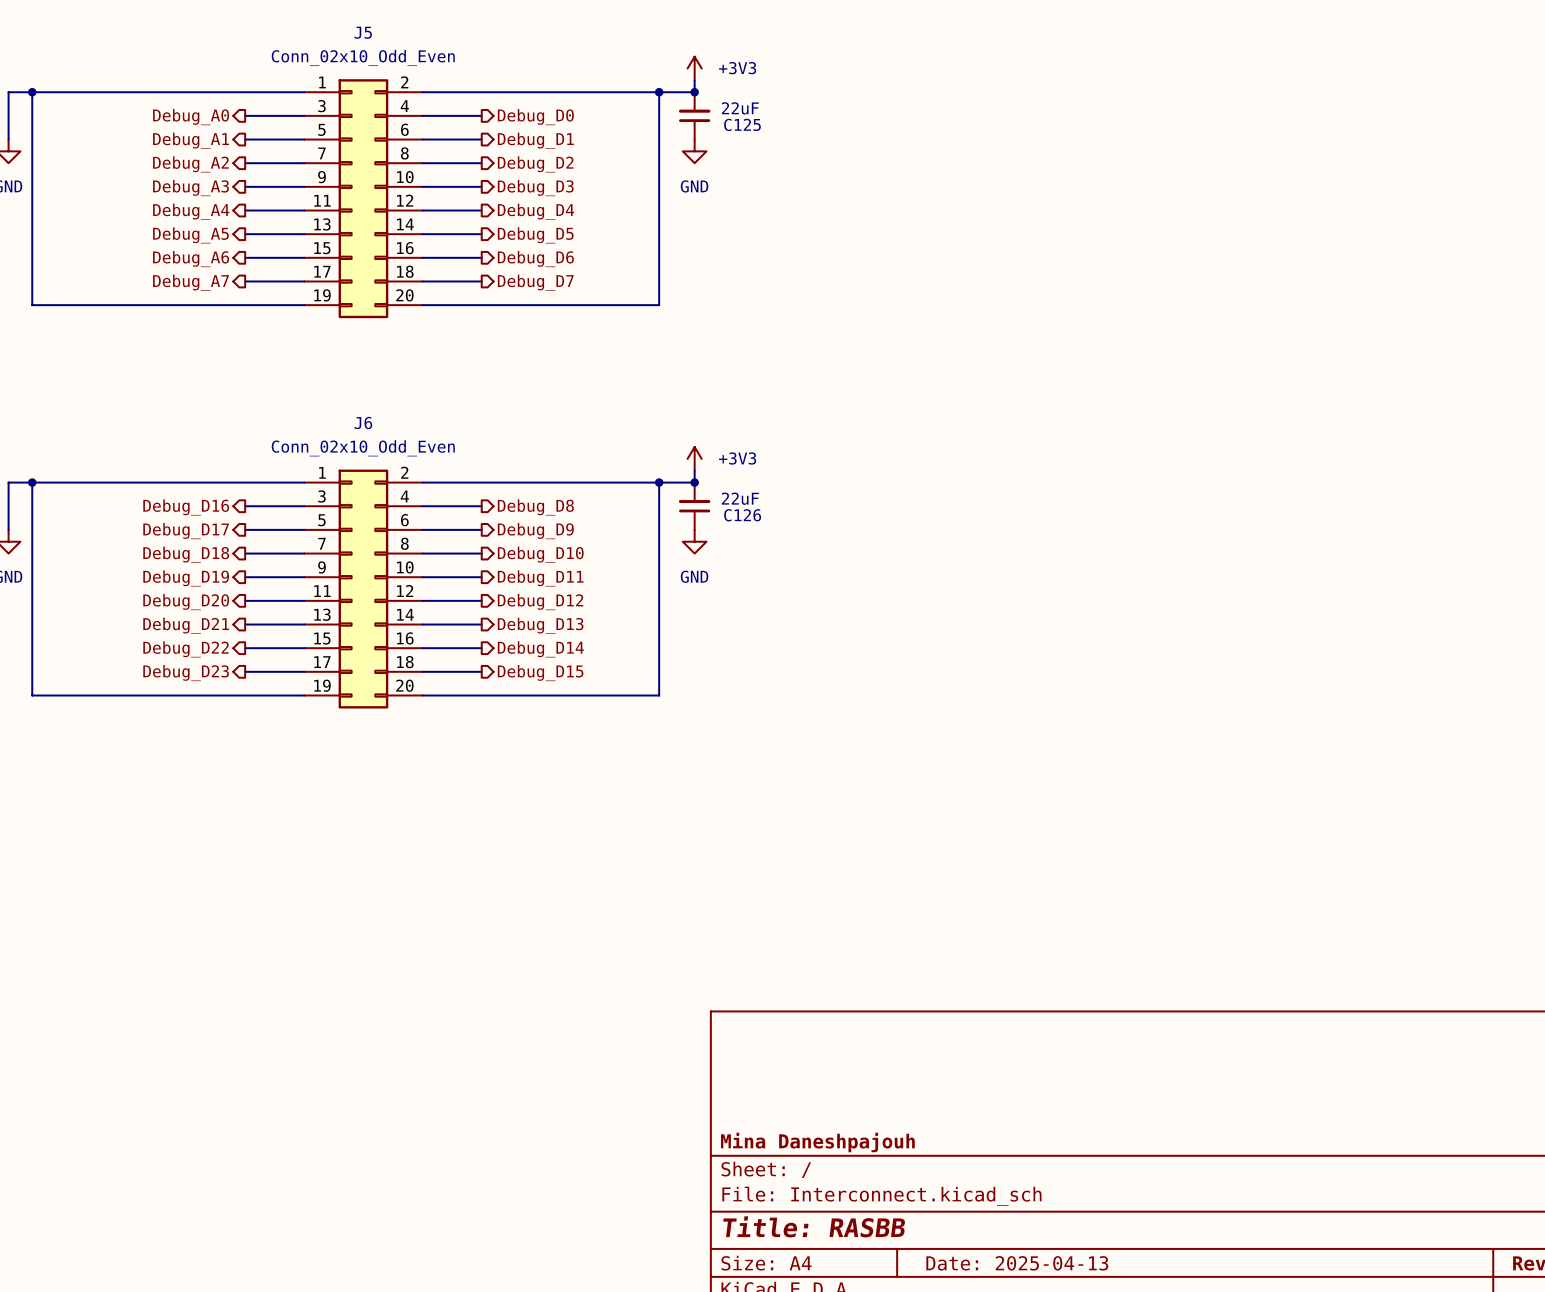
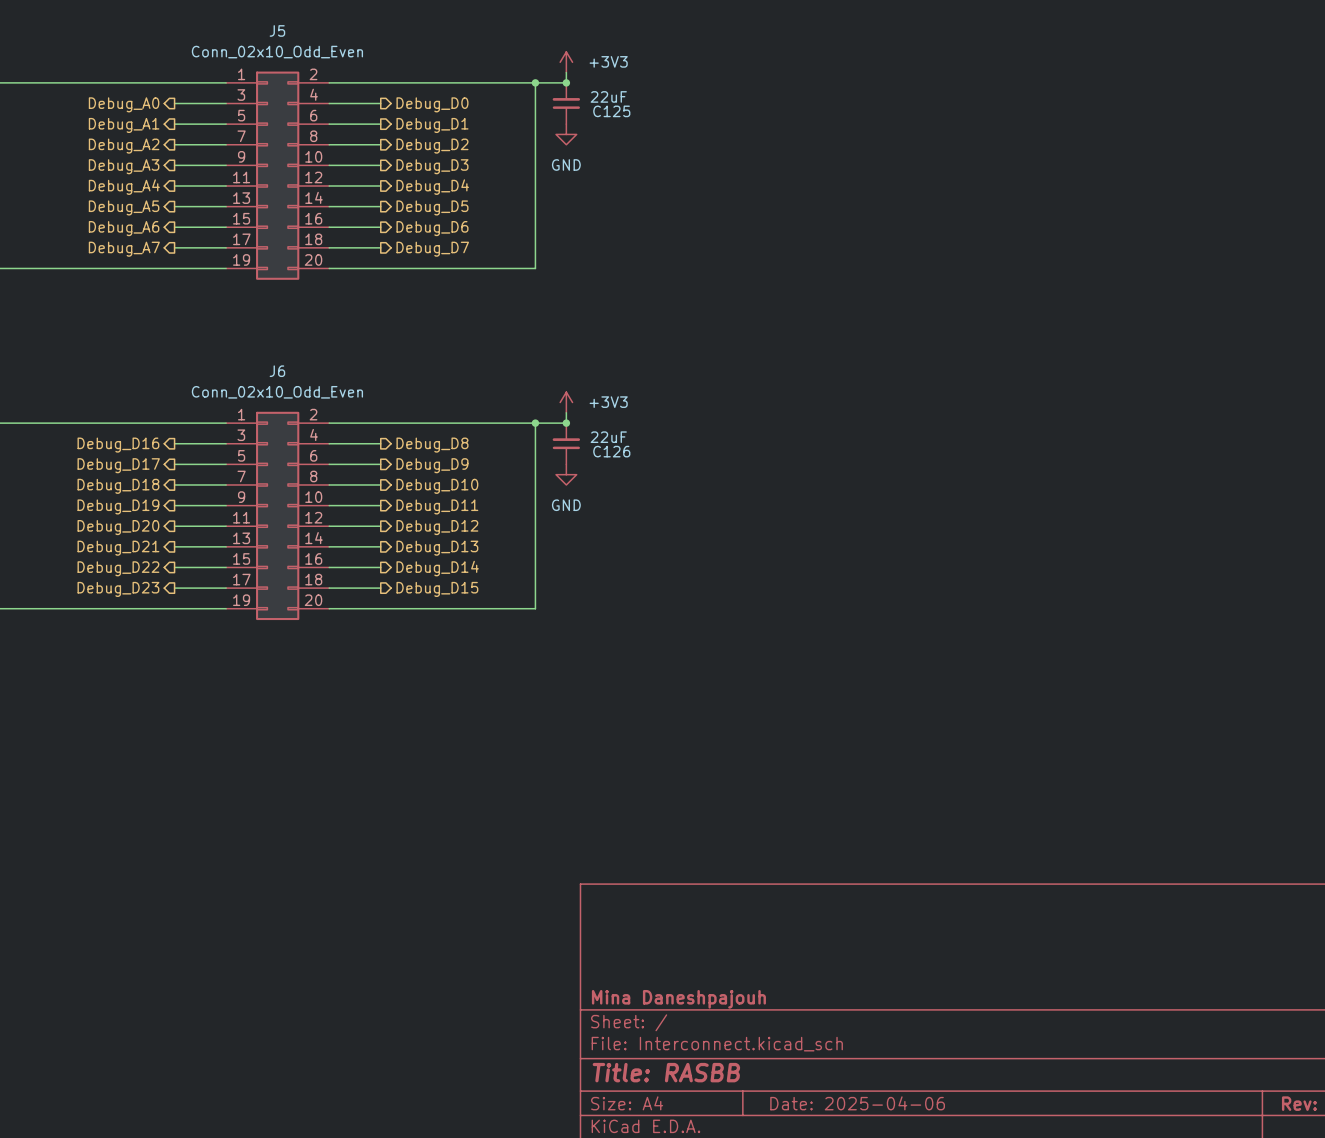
title block: Date: 2025-04-13 (1017, 1263) -> Date: 2025-04-06 (857, 1103)

